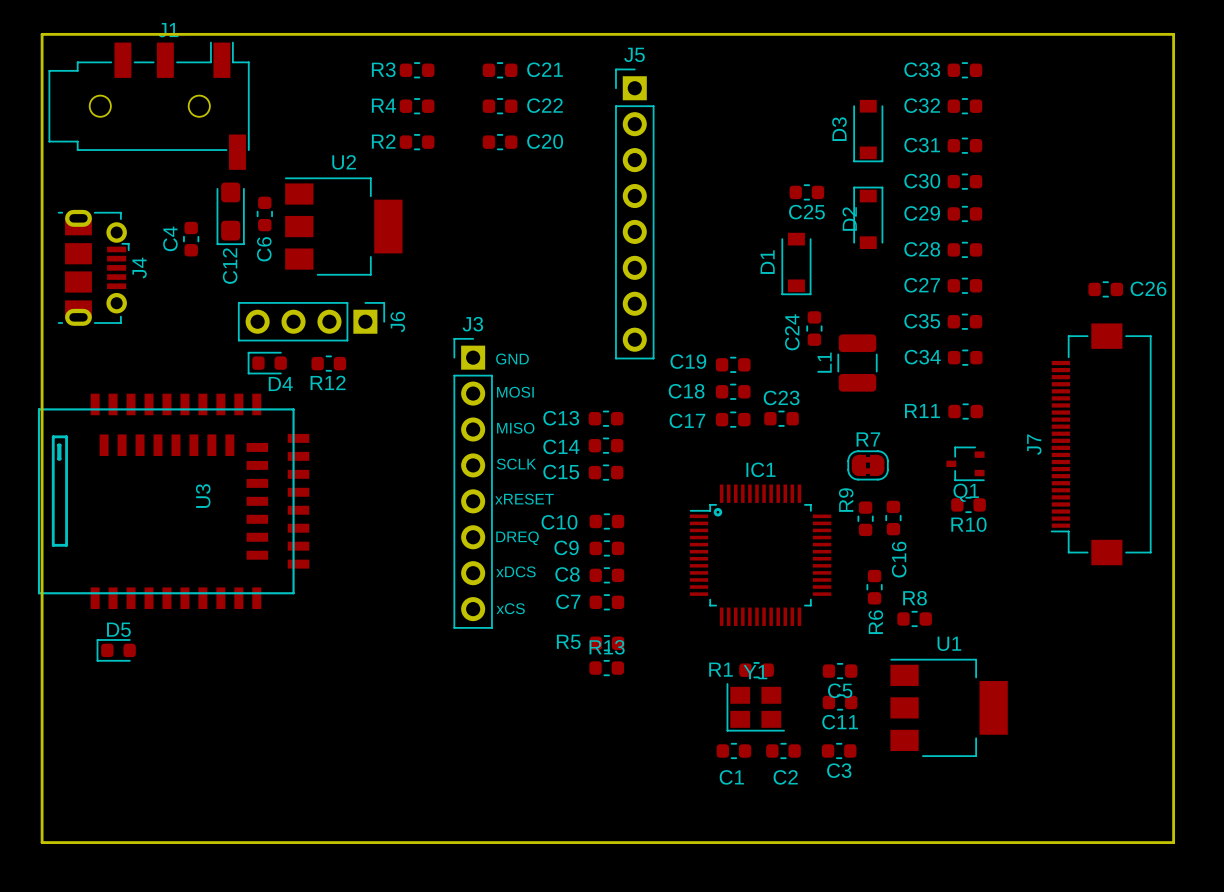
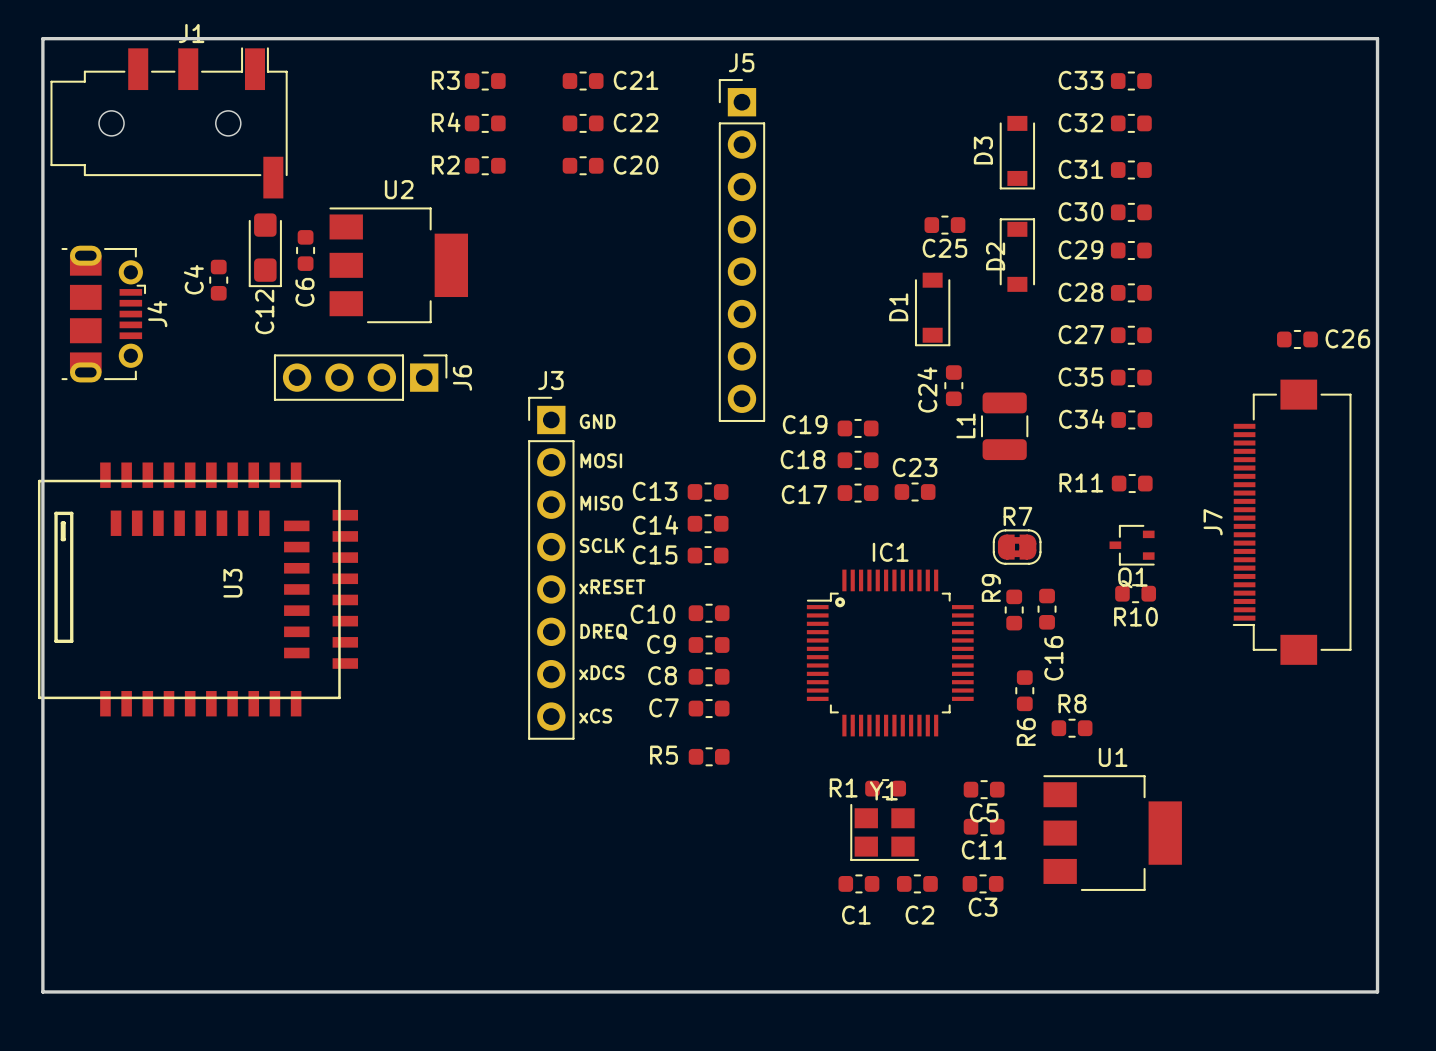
D4: (267, 363) -> none
R12: (328, 363) -> none
D5: (116, 650) -> none
R13: (606, 668) -> none

